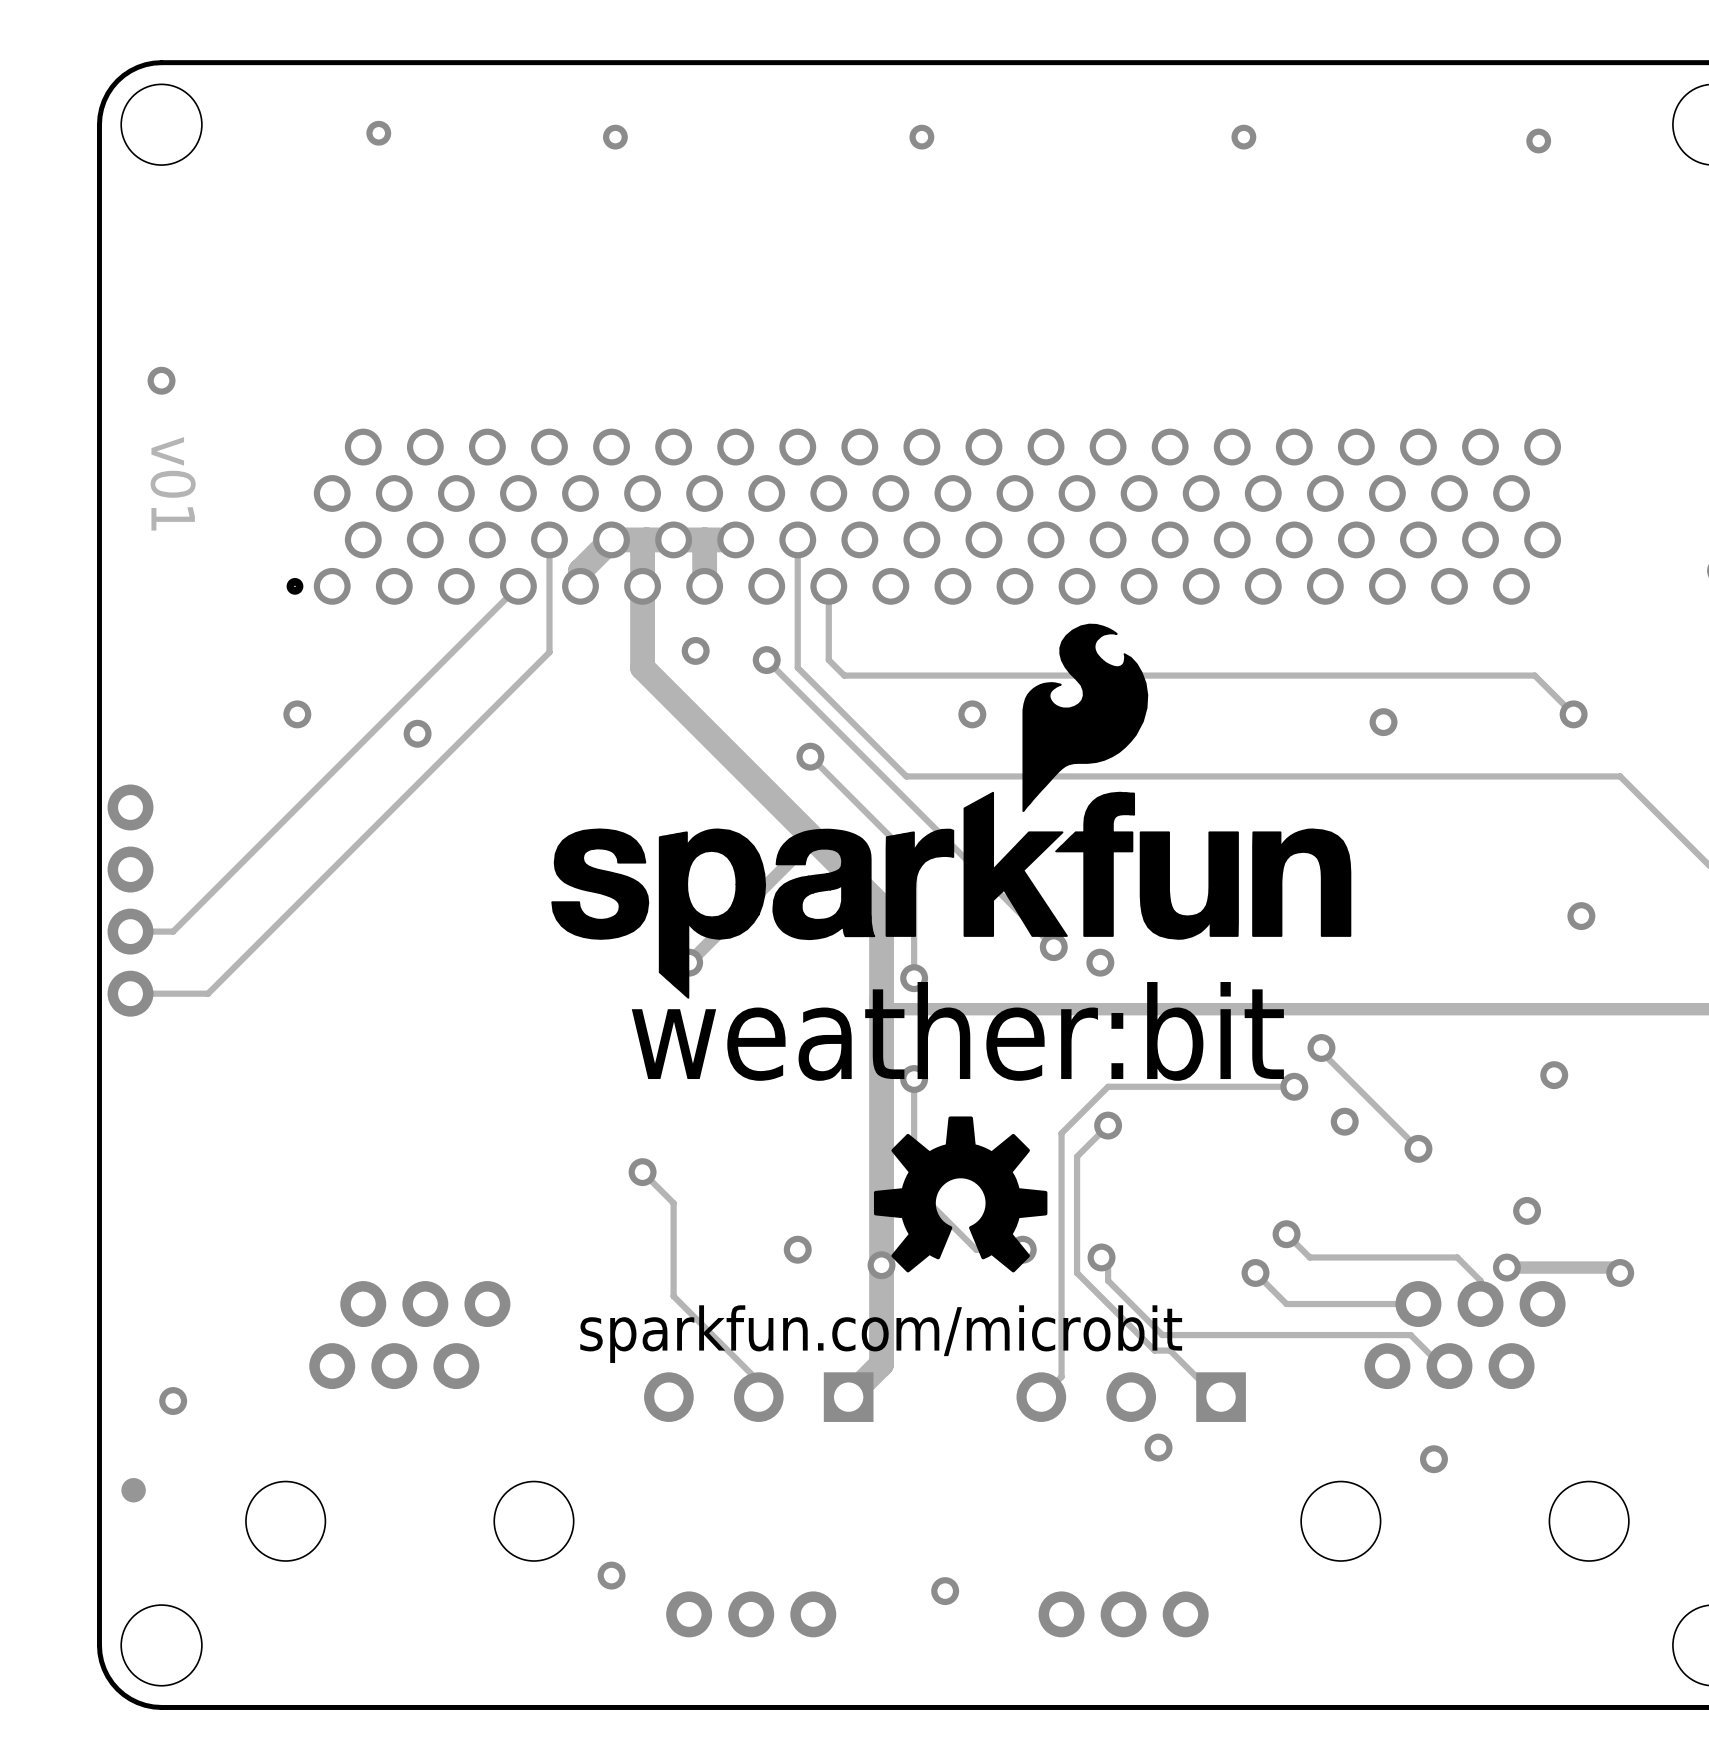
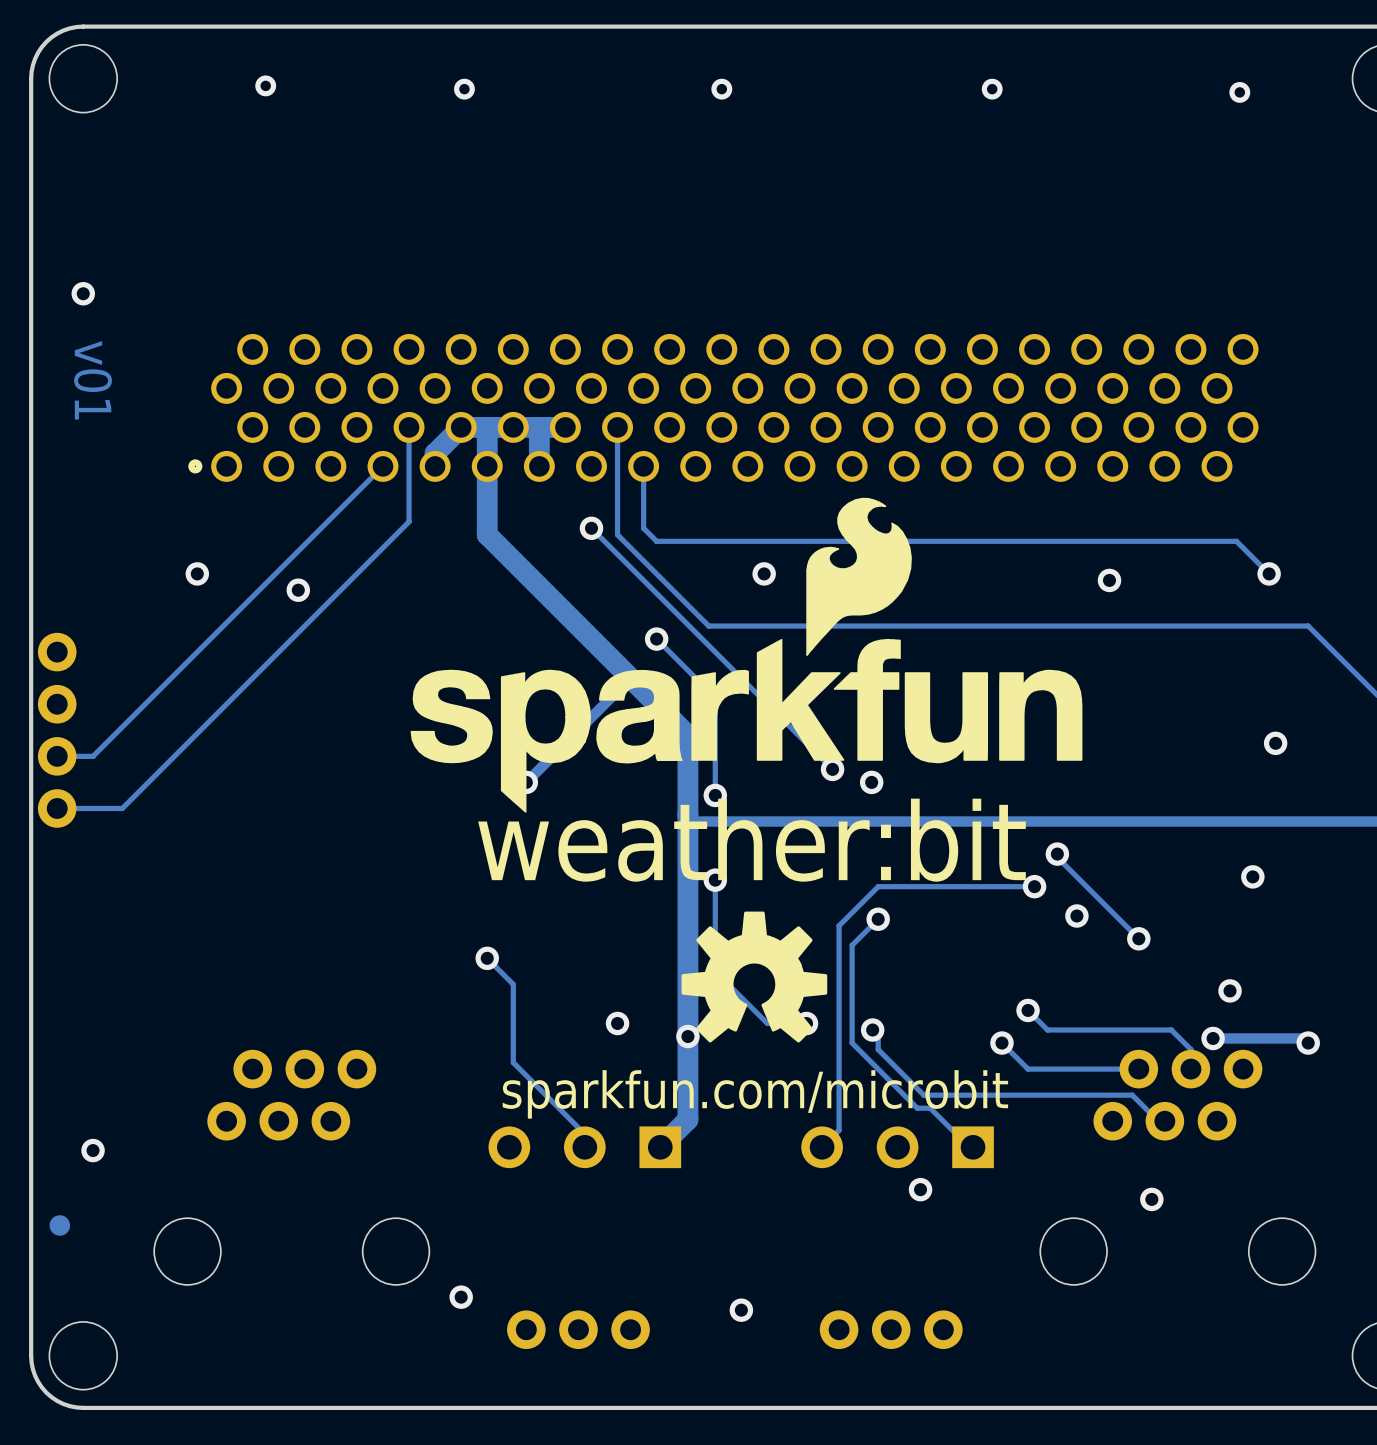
via: (695, 650) -> none
track: (810, 756) (914, 861) -> (656, 639) (715, 697)
via position: (810, 756) -> (656, 639)
text position: sparkfun.com/microbit (881, 1334) -> sparkfun.com/microbit (755, 1094)

